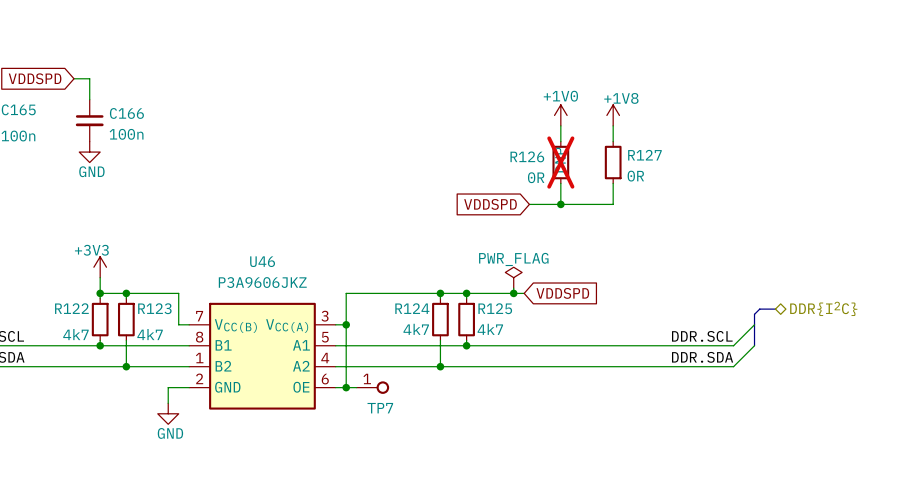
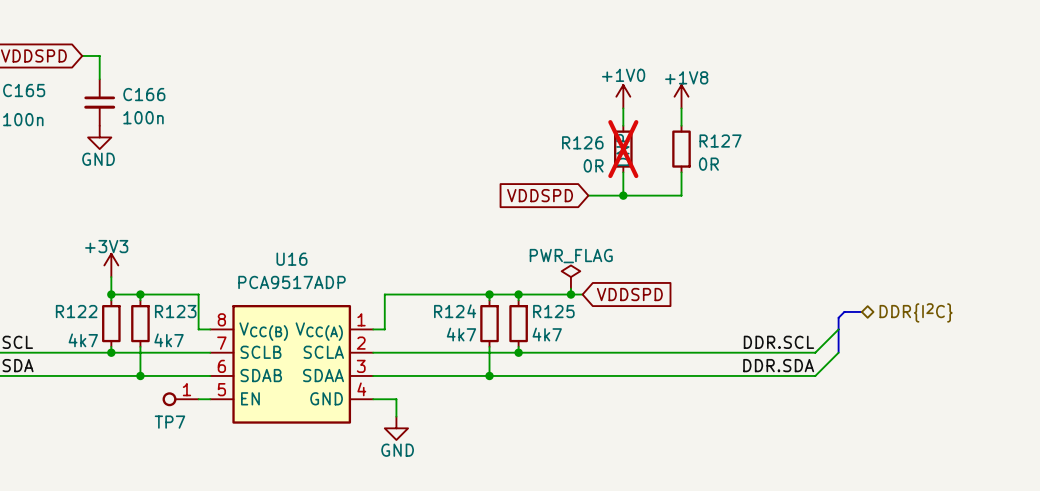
U46 name: U46 (262, 261) -> U16 (291, 259)
U46 text: P3A9606JKZ (262, 282) -> none
U46 value: none -> PCA9517ADP (291, 282)
U46 symbol: [189, 302, 336, 410] -> [210, 305, 374, 424]
wire: (346, 324) (346, 387) -> none
junction: (346, 324) -> none
wire: (178, 387) (168, 387) (168, 403) -> none
junction: (346, 387) -> none
wire: none -> (396, 399) (396, 416)
TP7 position: (372, 387) -> (180, 399)
TP7 rotation: 0° (382, 387) -> 180° (169, 399)
TP7 name position: TP7 (380, 408) -> TP7 (169, 422)
power symbol position: GND (168, 413) -> GND (396, 428)
power symbol text position: GND (170, 433) -> GND (397, 450)

